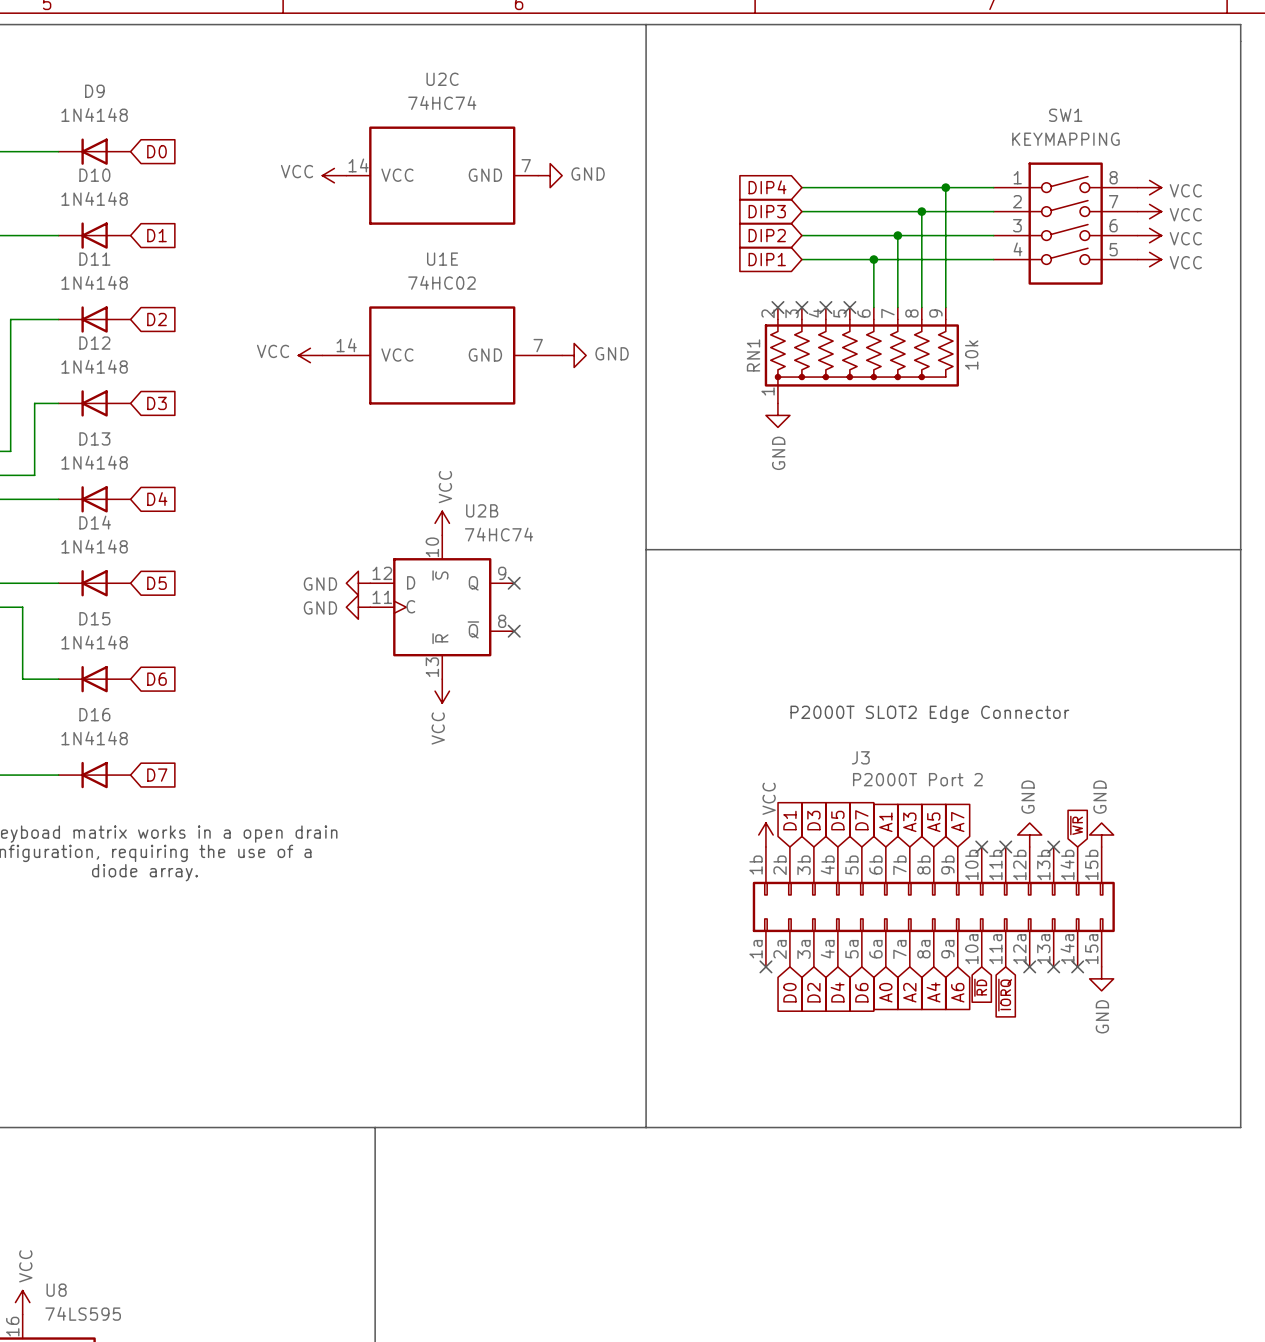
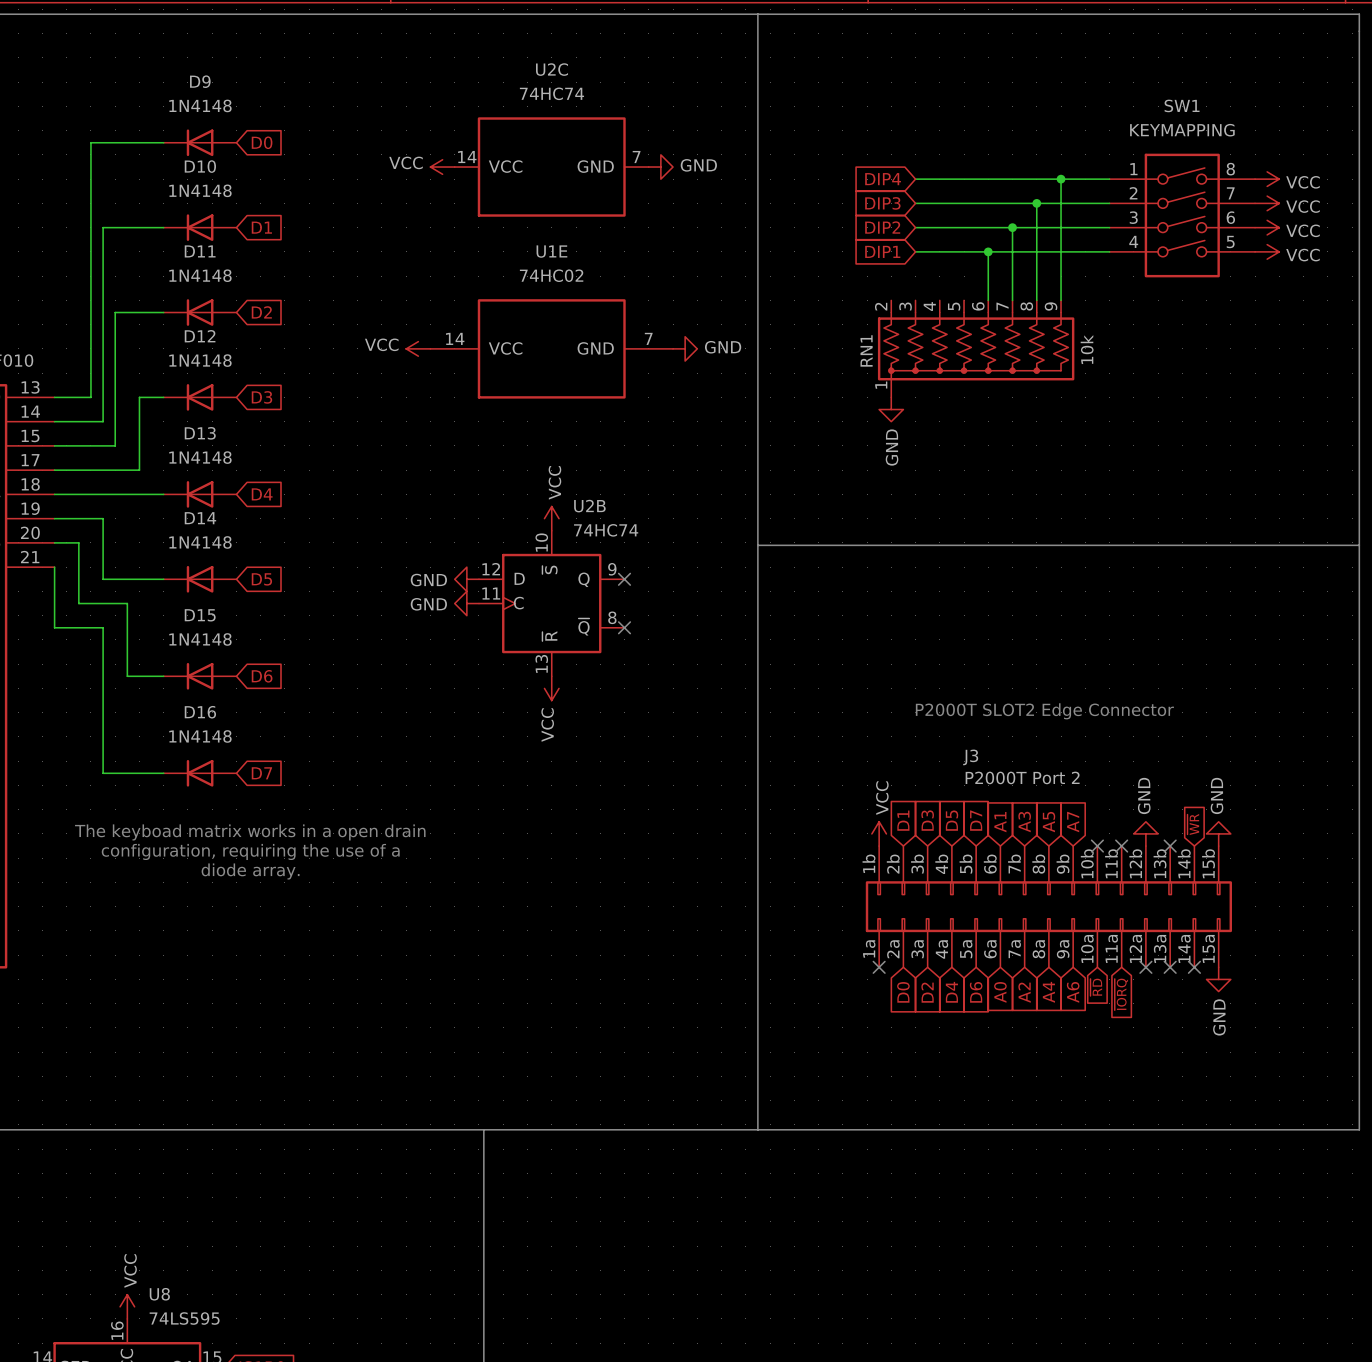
no-connect mark: (777, 307) -> none
no-connect mark: (801, 307) -> none
no-connect mark: (825, 307) -> none
no-connect mark: (849, 307) -> none

